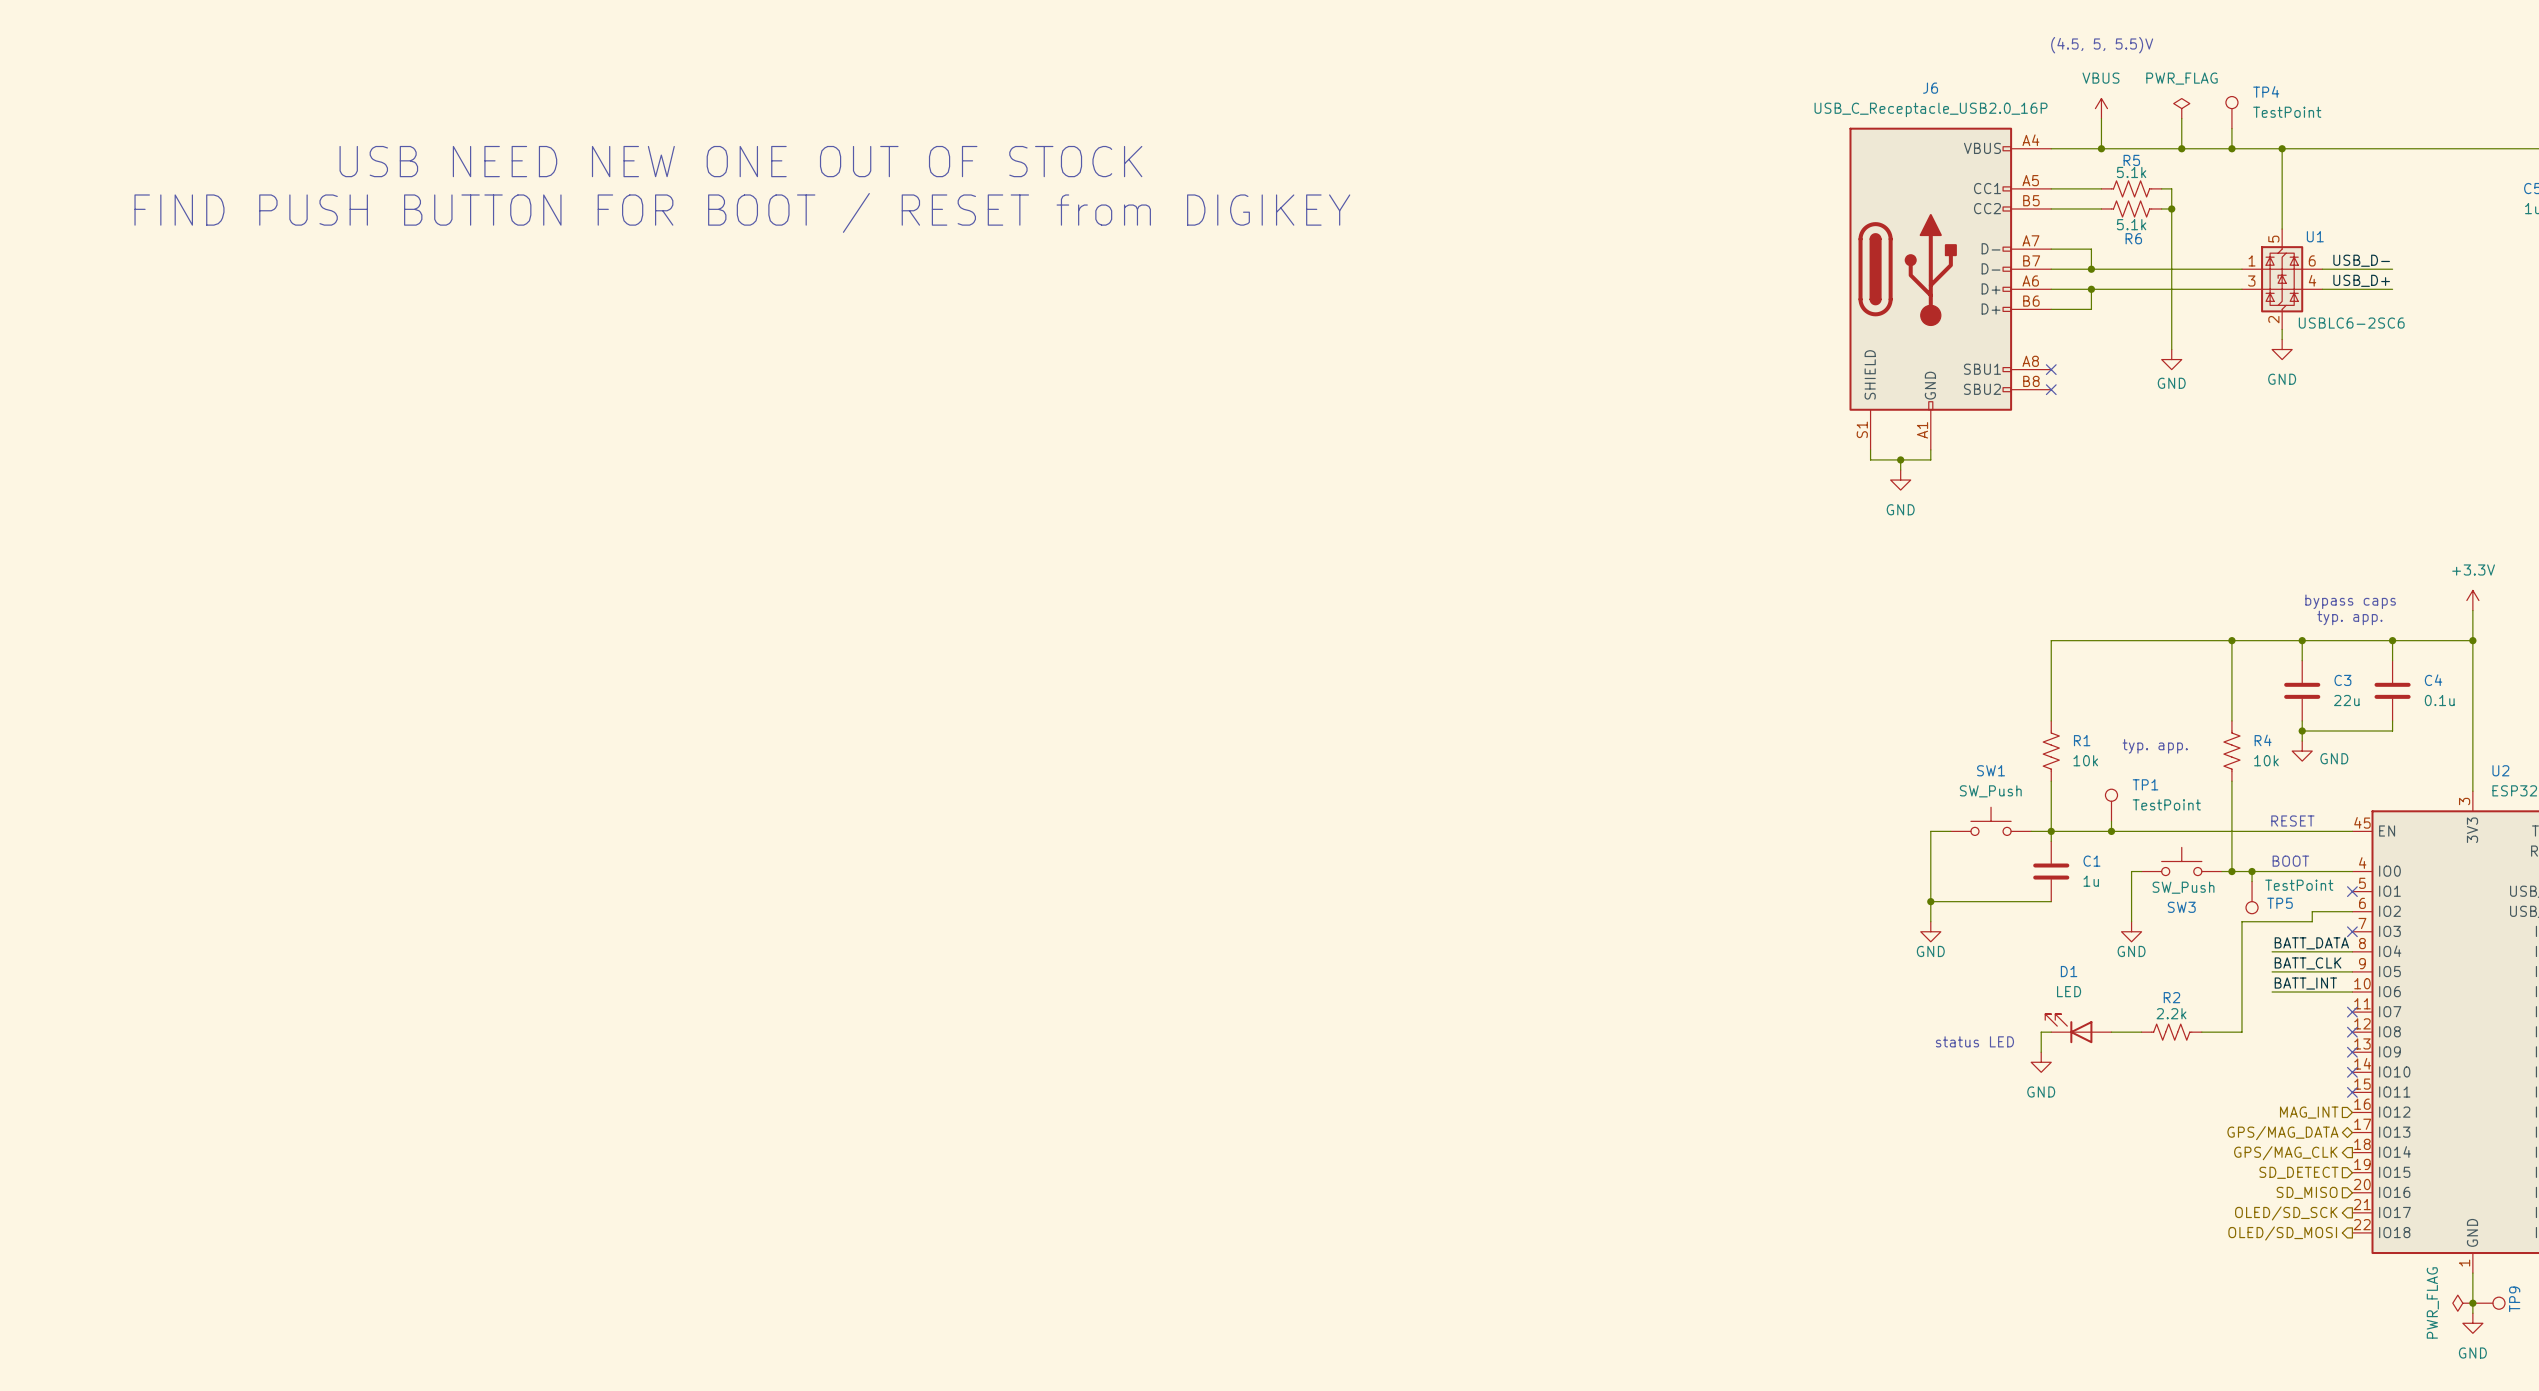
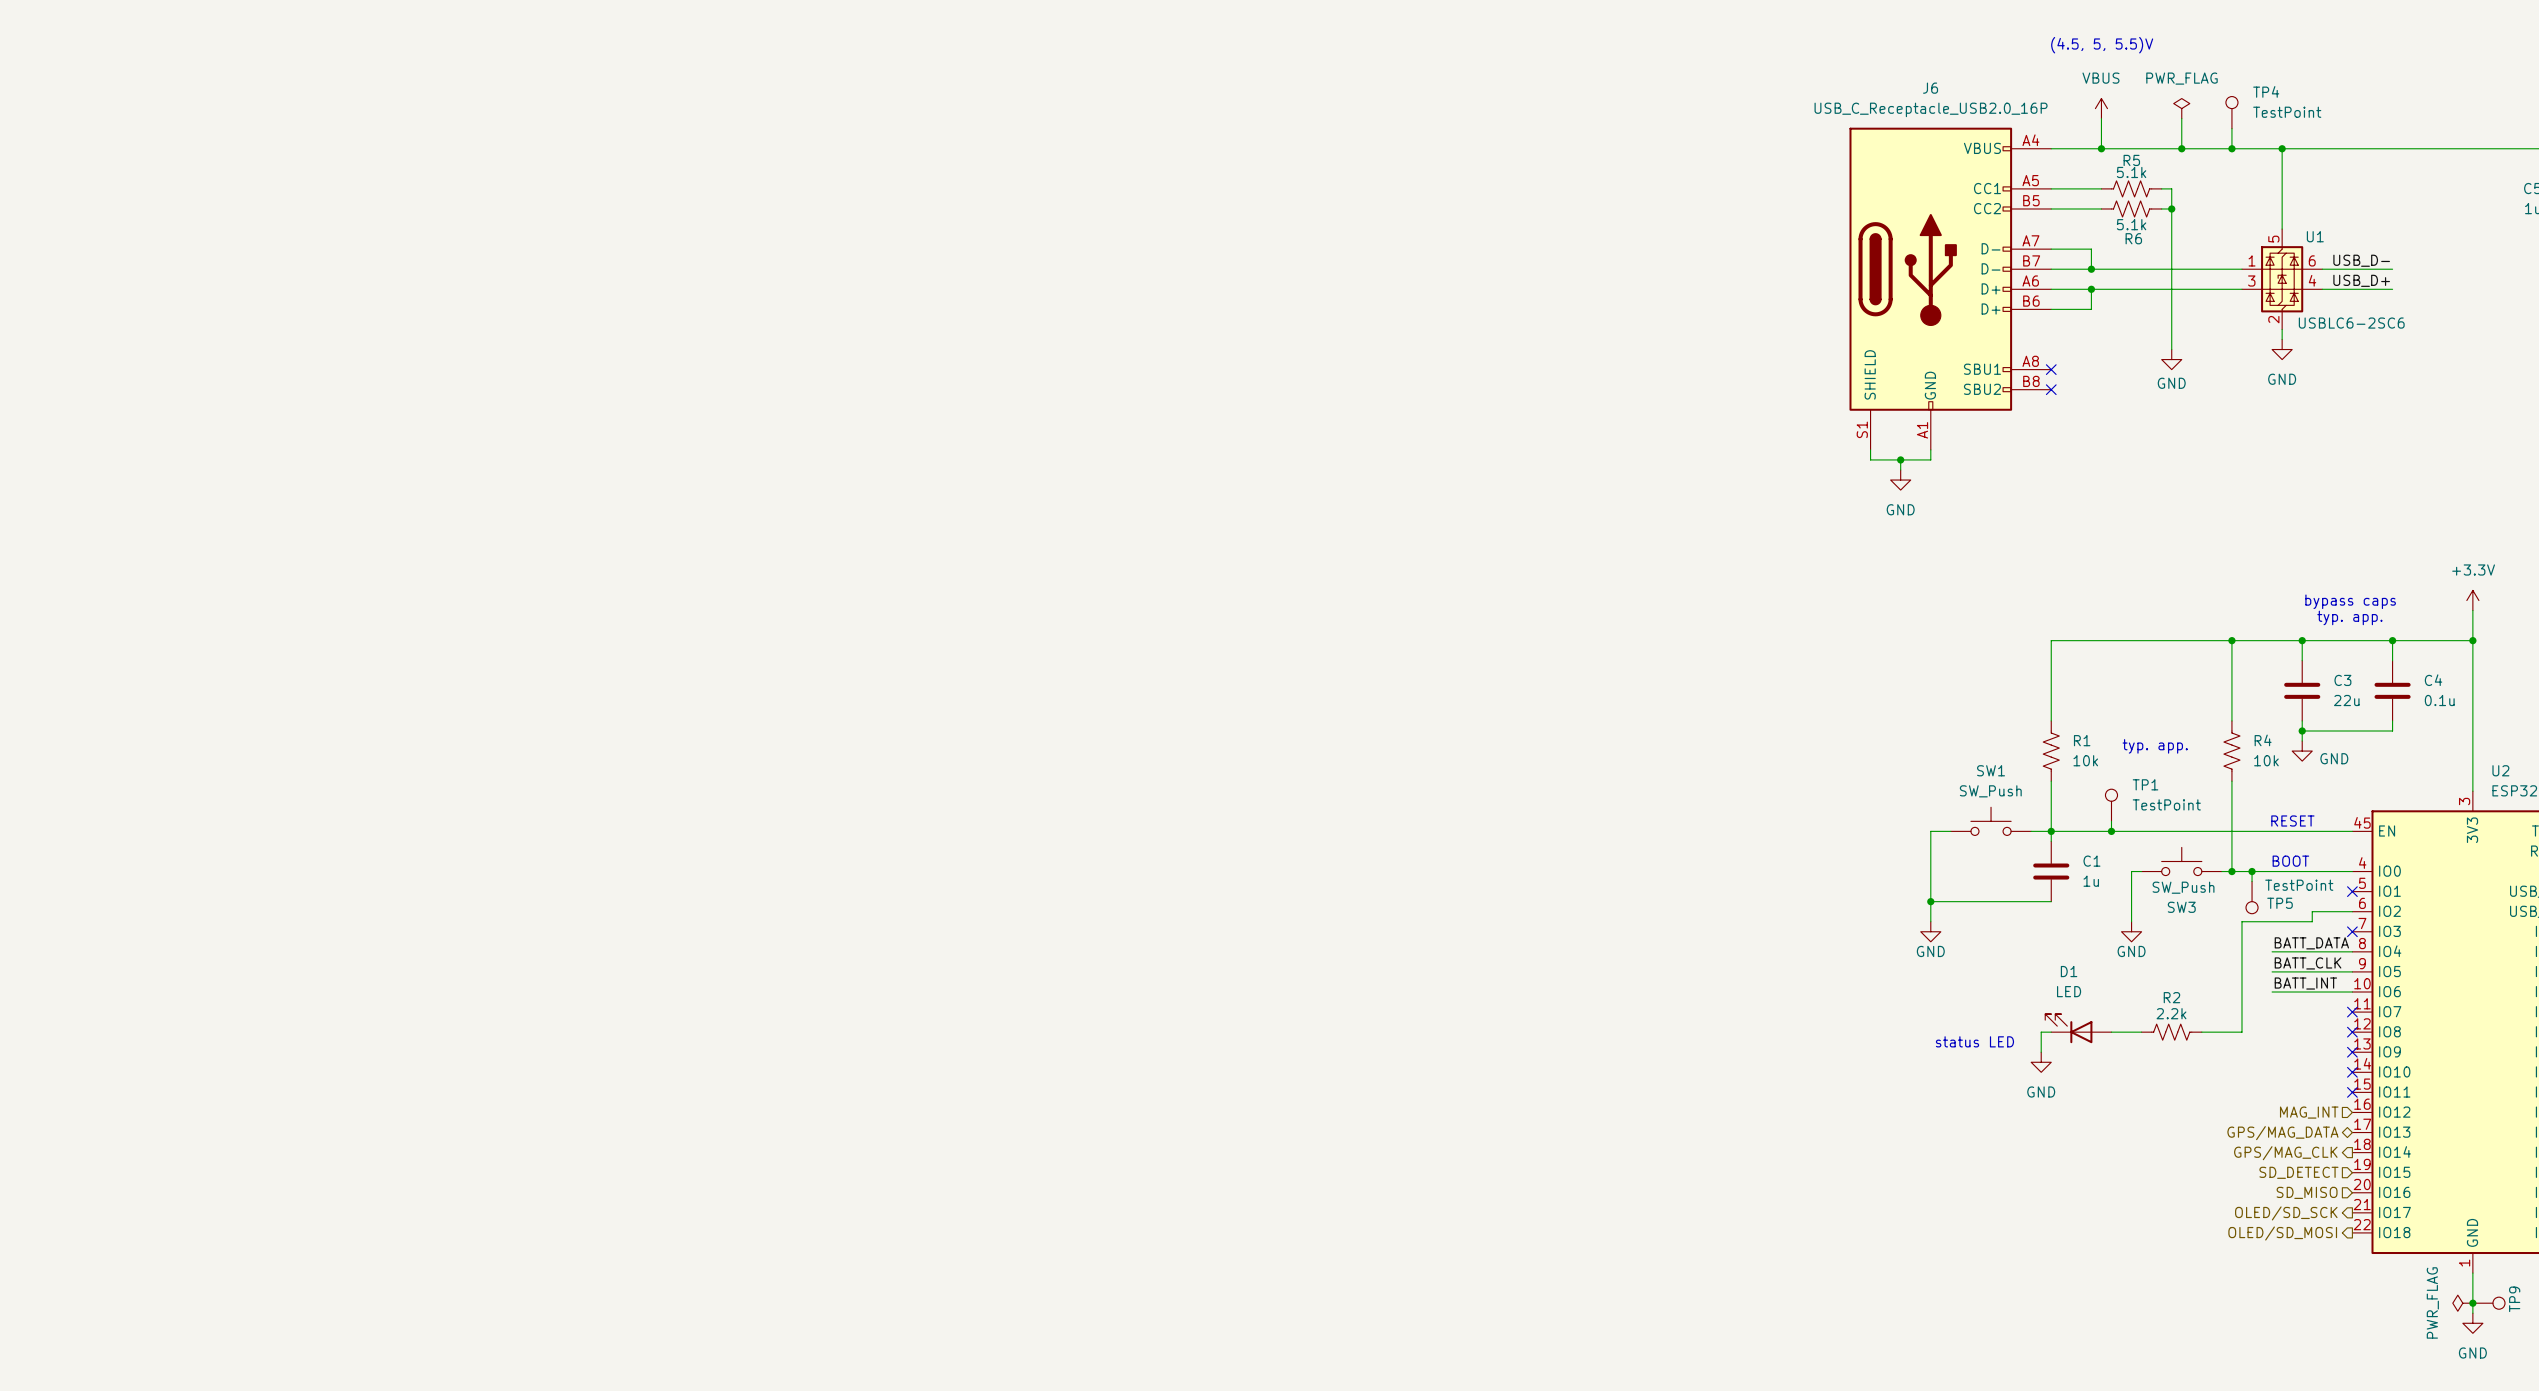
text: USB NEED NEW ONE OUT OF STOCK (740, 161) -> none
text: FIND PUSH BUTTON FOR BOOT / RESET from DIGIKEY (742, 212) -> none

